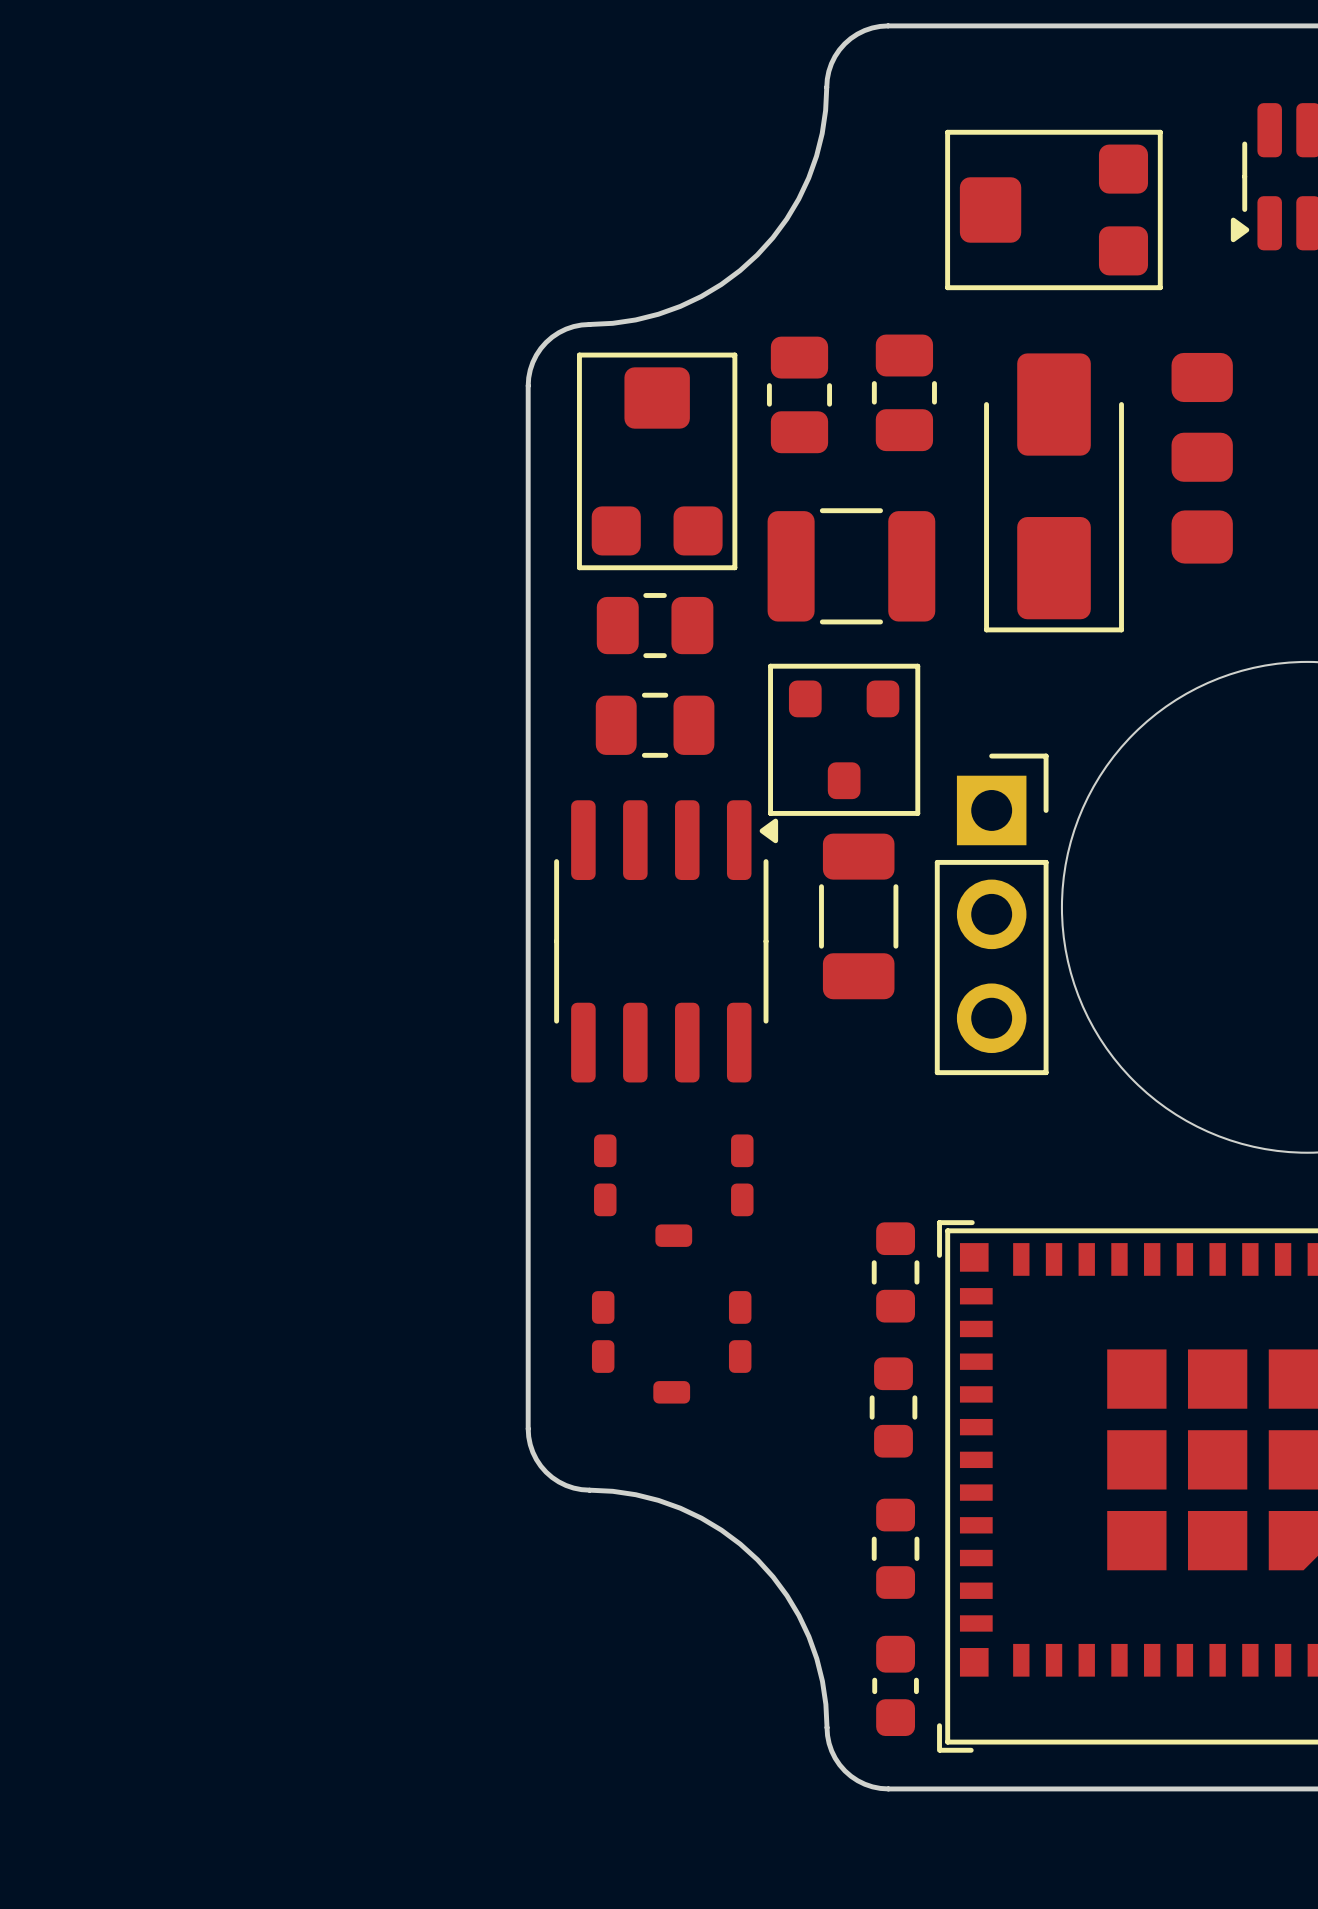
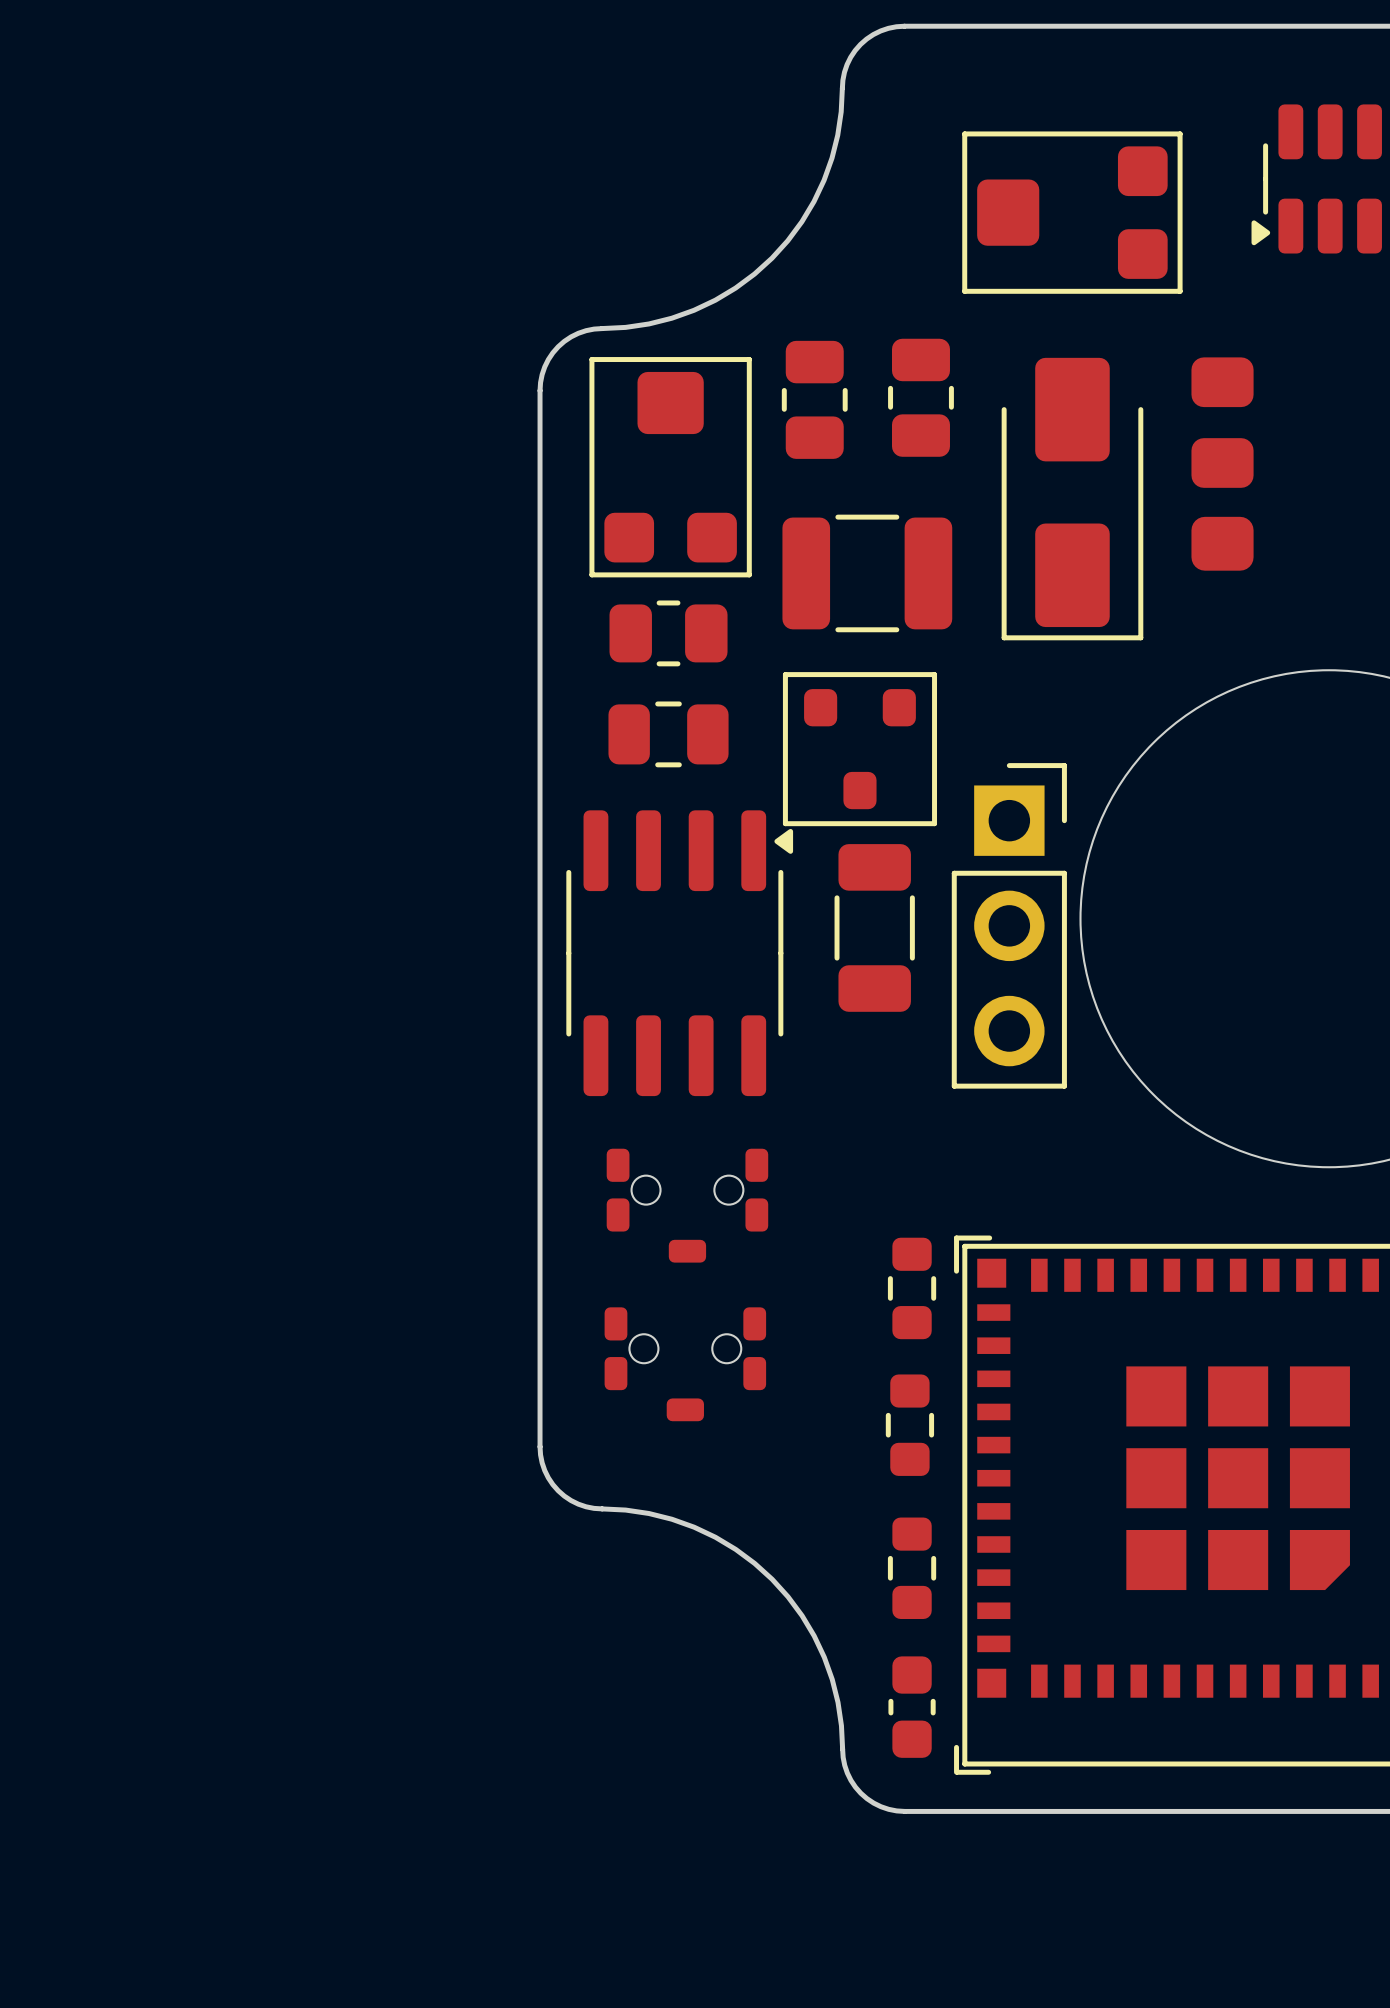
part footprint: [594, 1134, 754, 1247] -> [606, 1148, 769, 1263]
part footprint: [591, 1291, 752, 1404] -> [604, 1307, 767, 1422]

